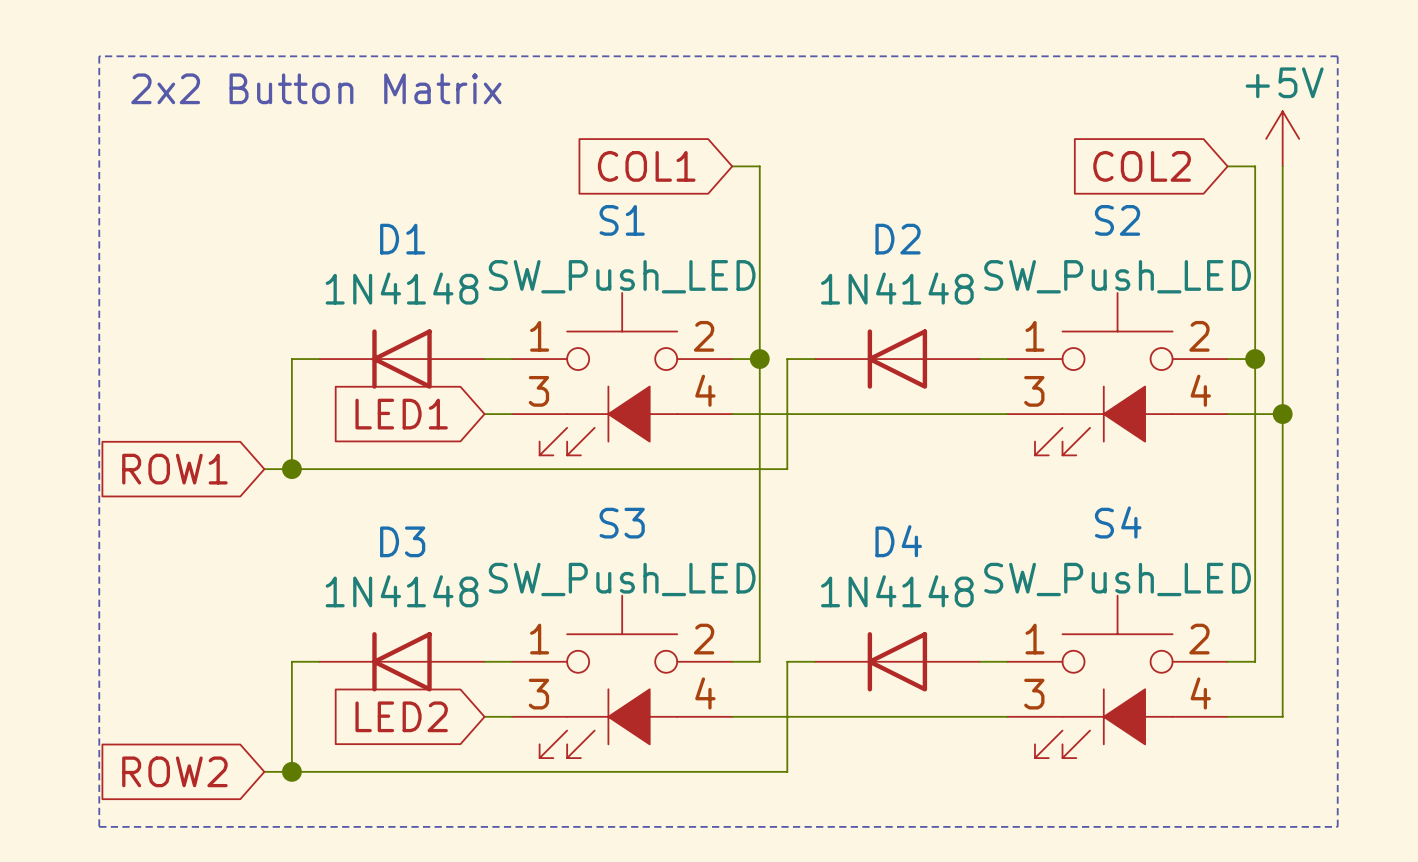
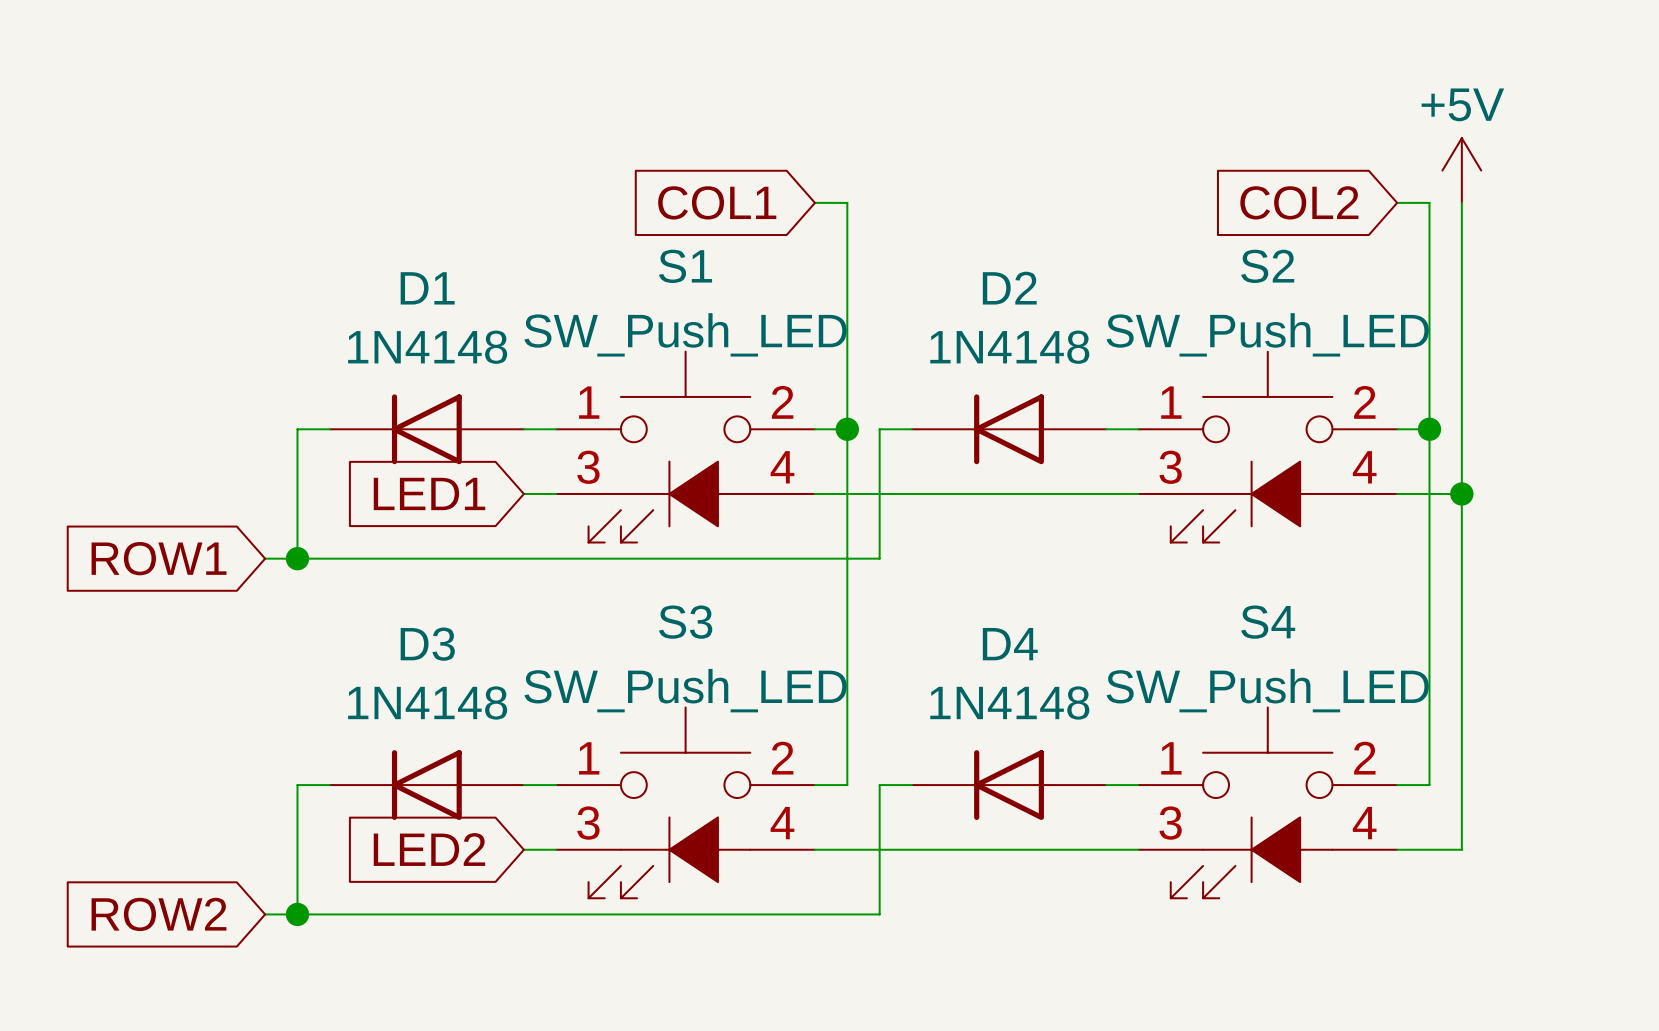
line: (99, 56) (99, 826) (1337, 826) (1337, 56) (99, 56) -> none
text: 2x2 Button Matrix (316, 88) -> none

